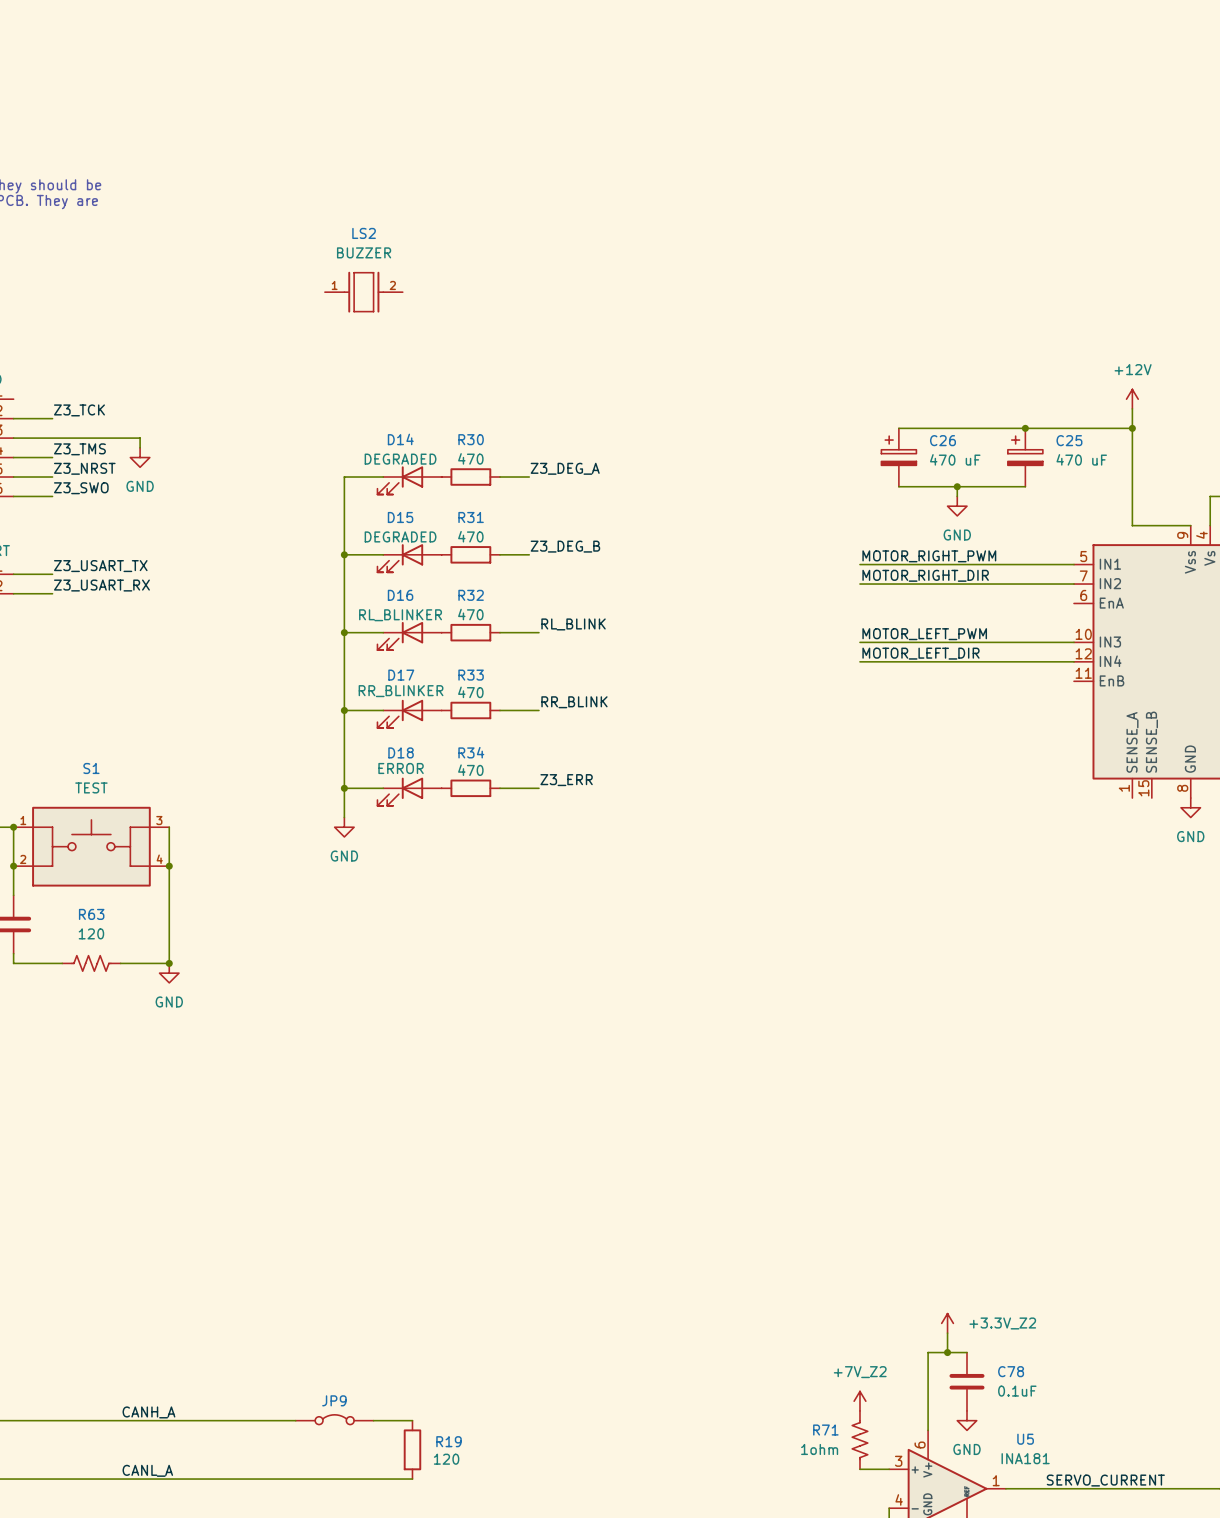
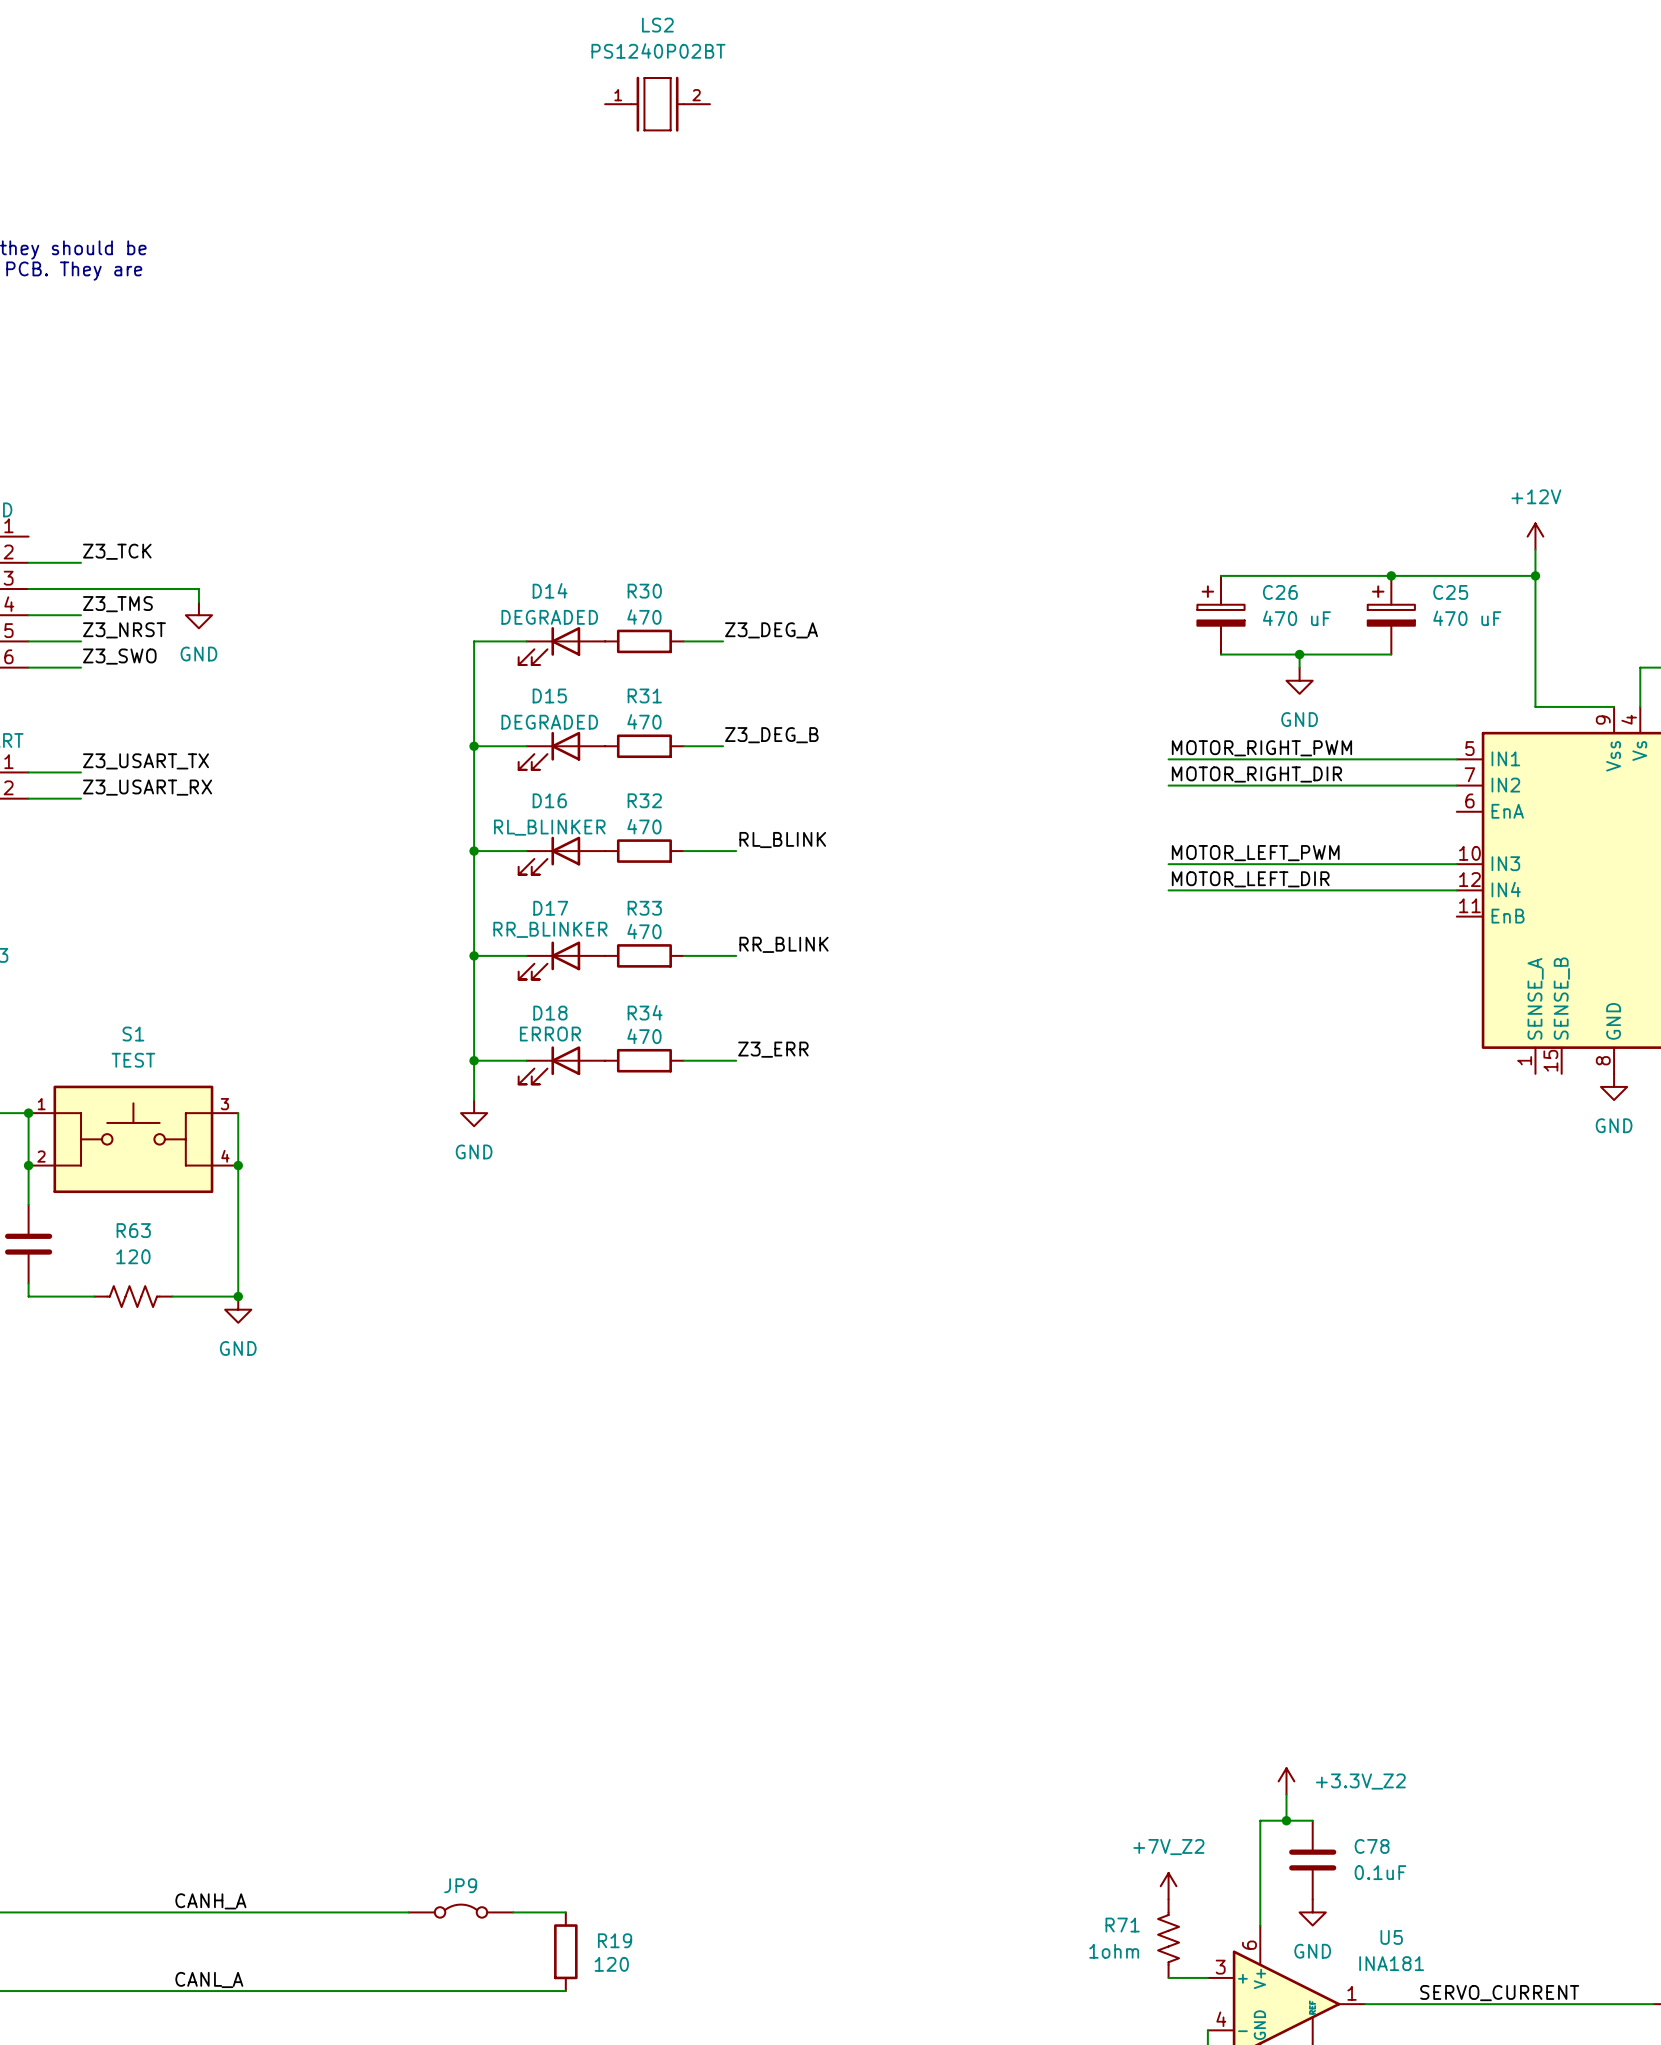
LS2 value: BUZZER (364, 252) -> PS1240P02BT (658, 50)
LS2 position: (363, 292) -> (657, 104)

